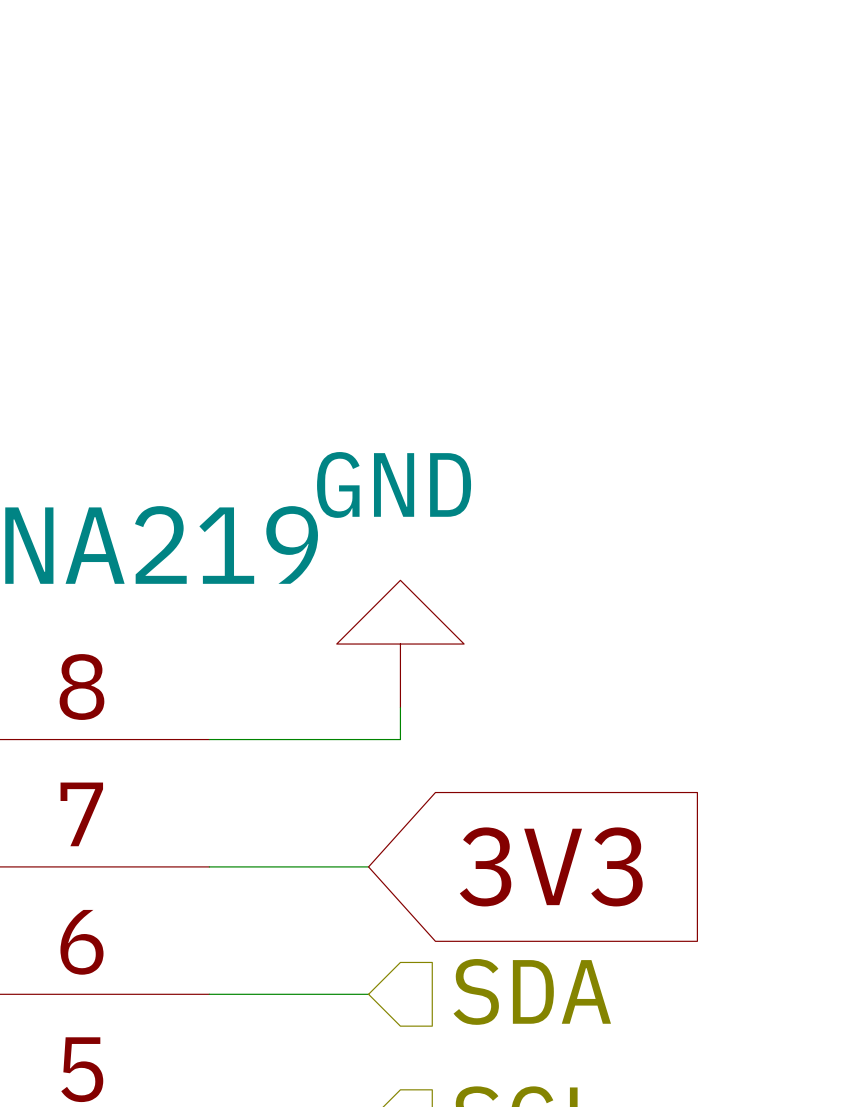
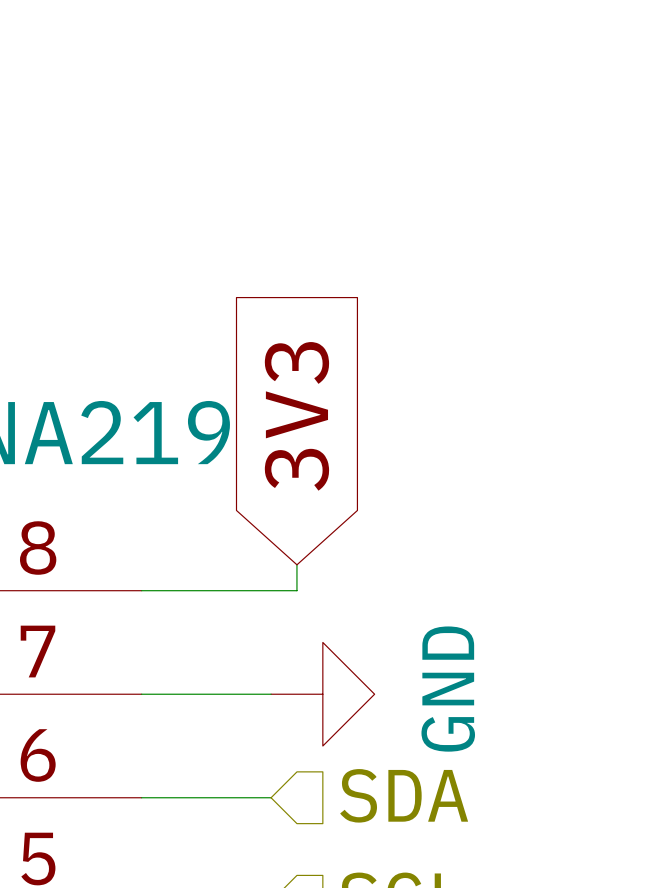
power symbol rotation: 0° (400, 644) -> 90° clockwise (322, 694)
power symbol position: GND (400, 644) -> GND (322, 694)
global label rotation: 0° (551, 866) -> 90° counterclockwise (296, 416)

